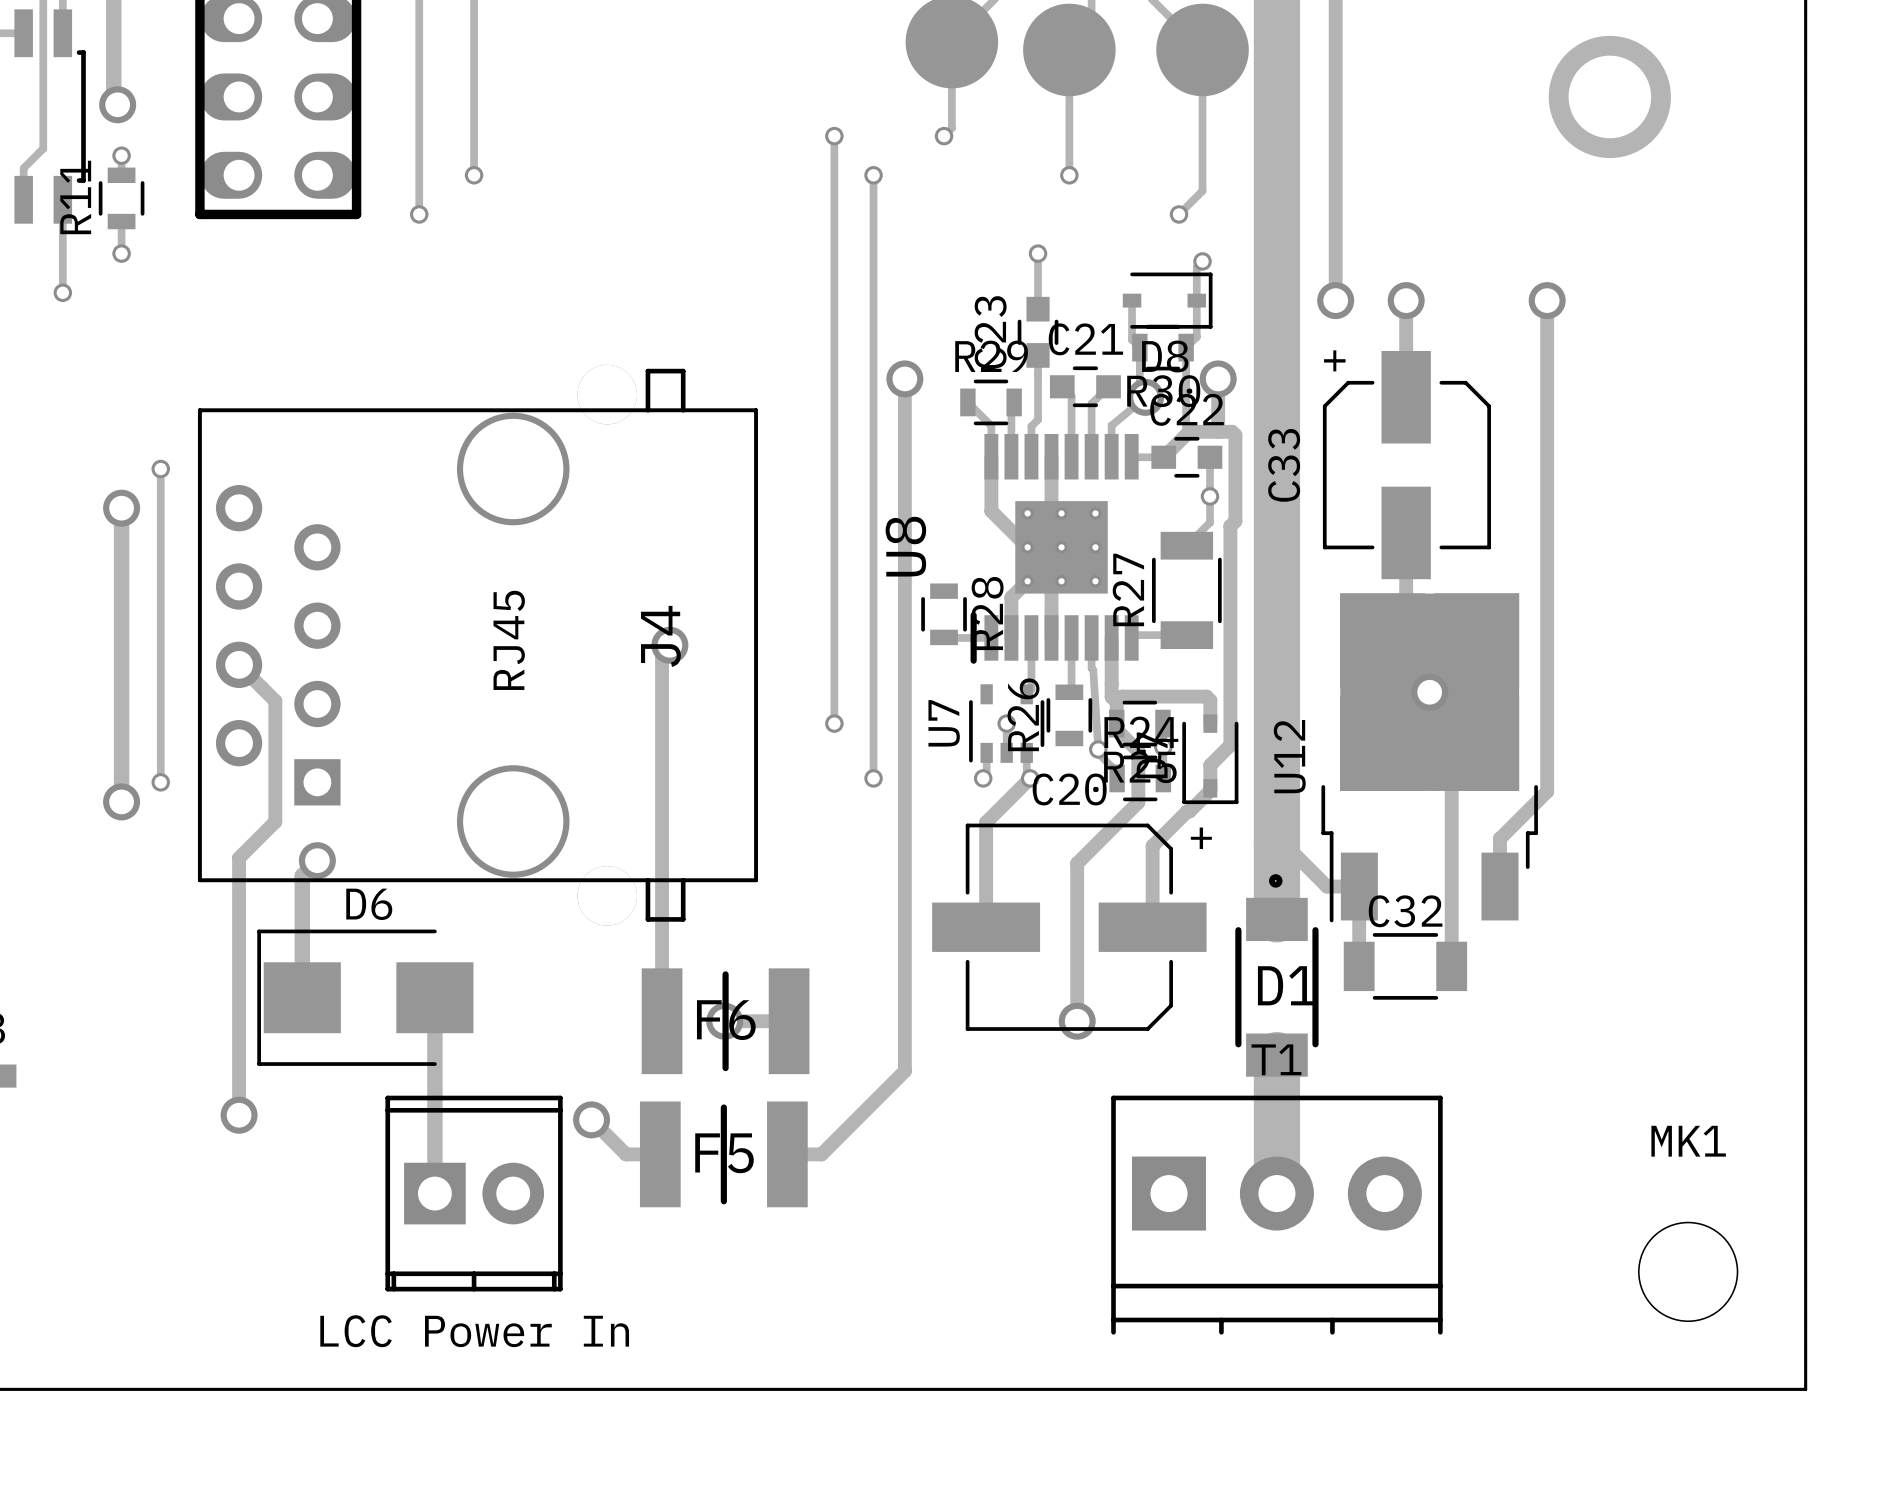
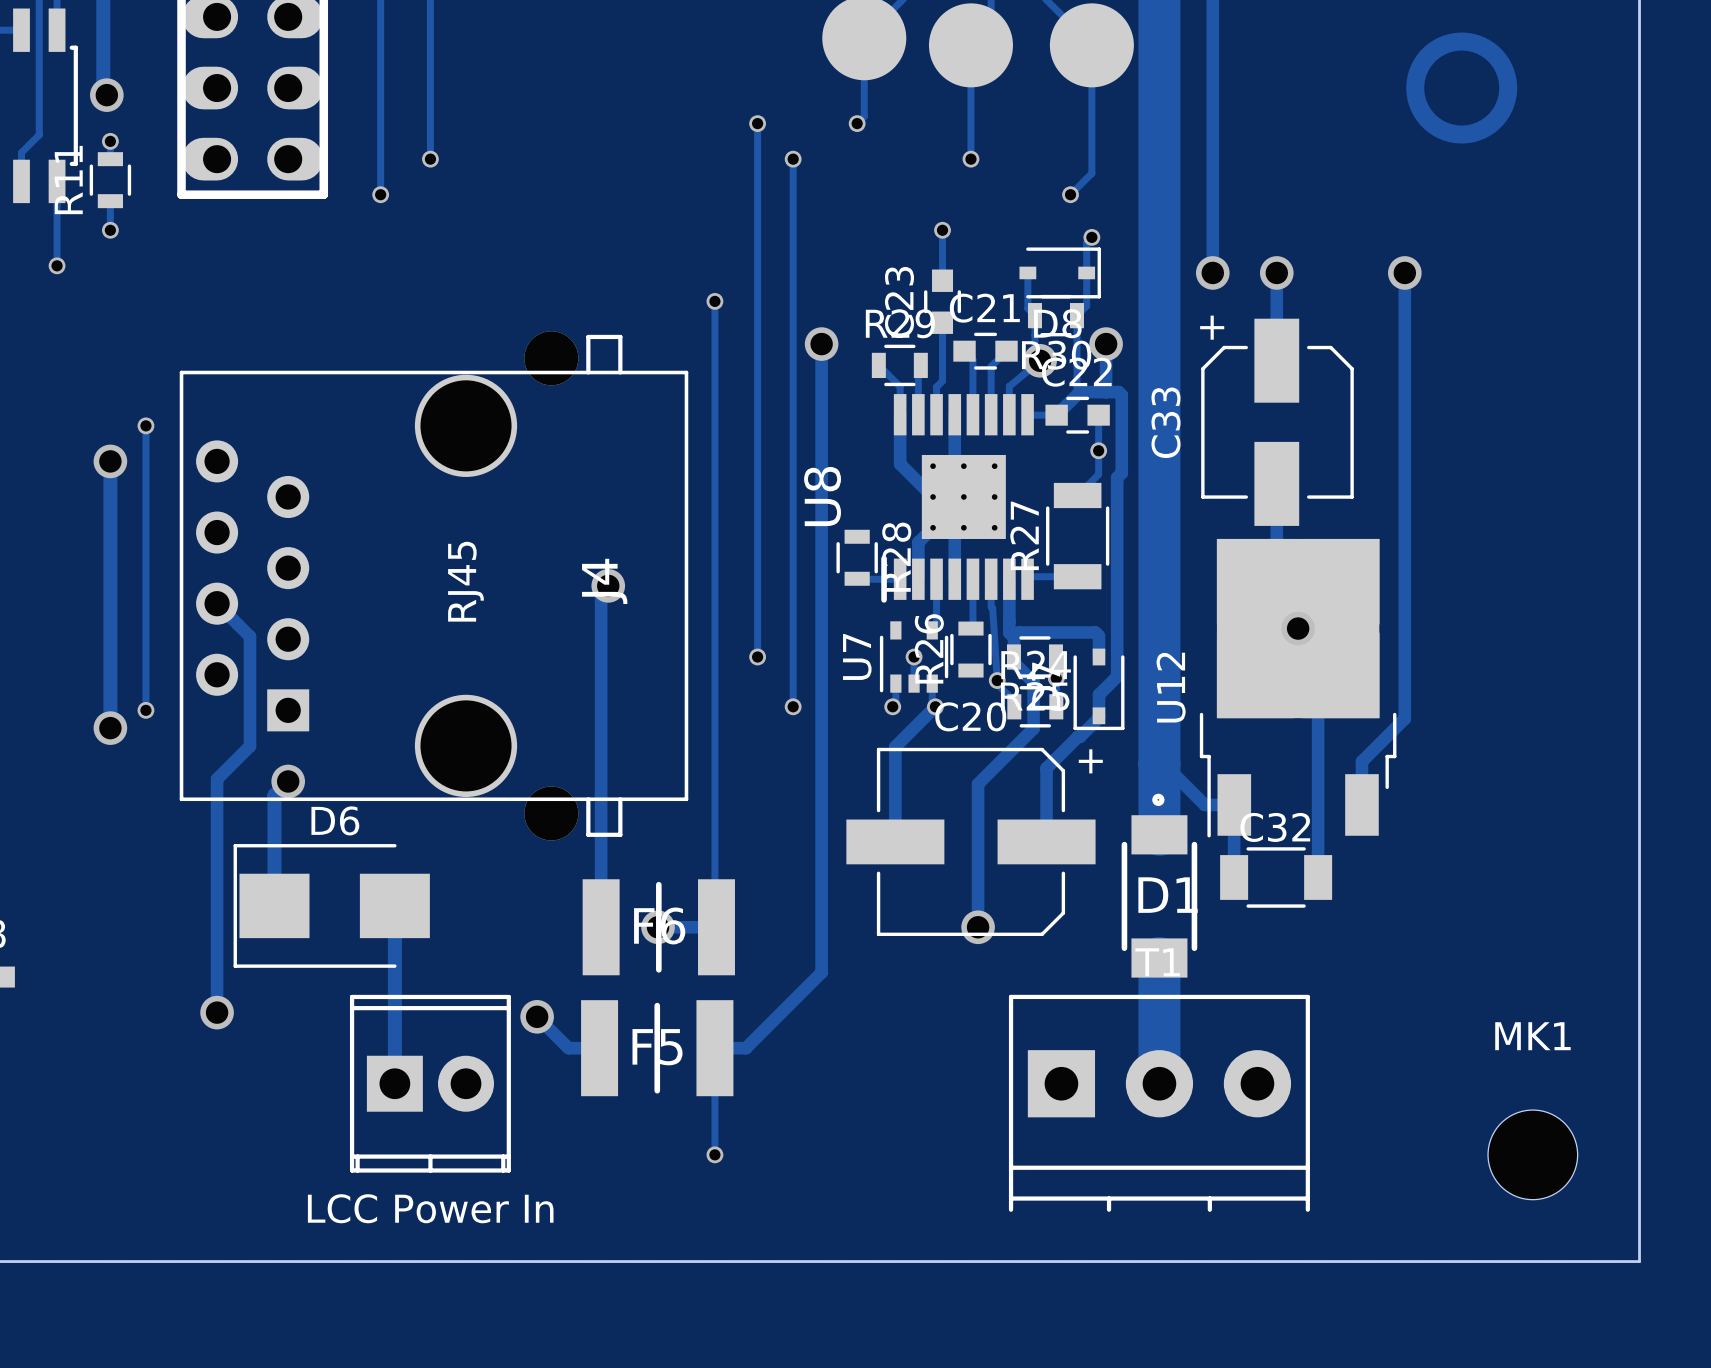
track: none -> (714, 301) (714, 925) (716, 927)
via: none -> (714, 301)
track: none -> (714, 1048) (714, 1154)
via: none -> (714, 1154)

